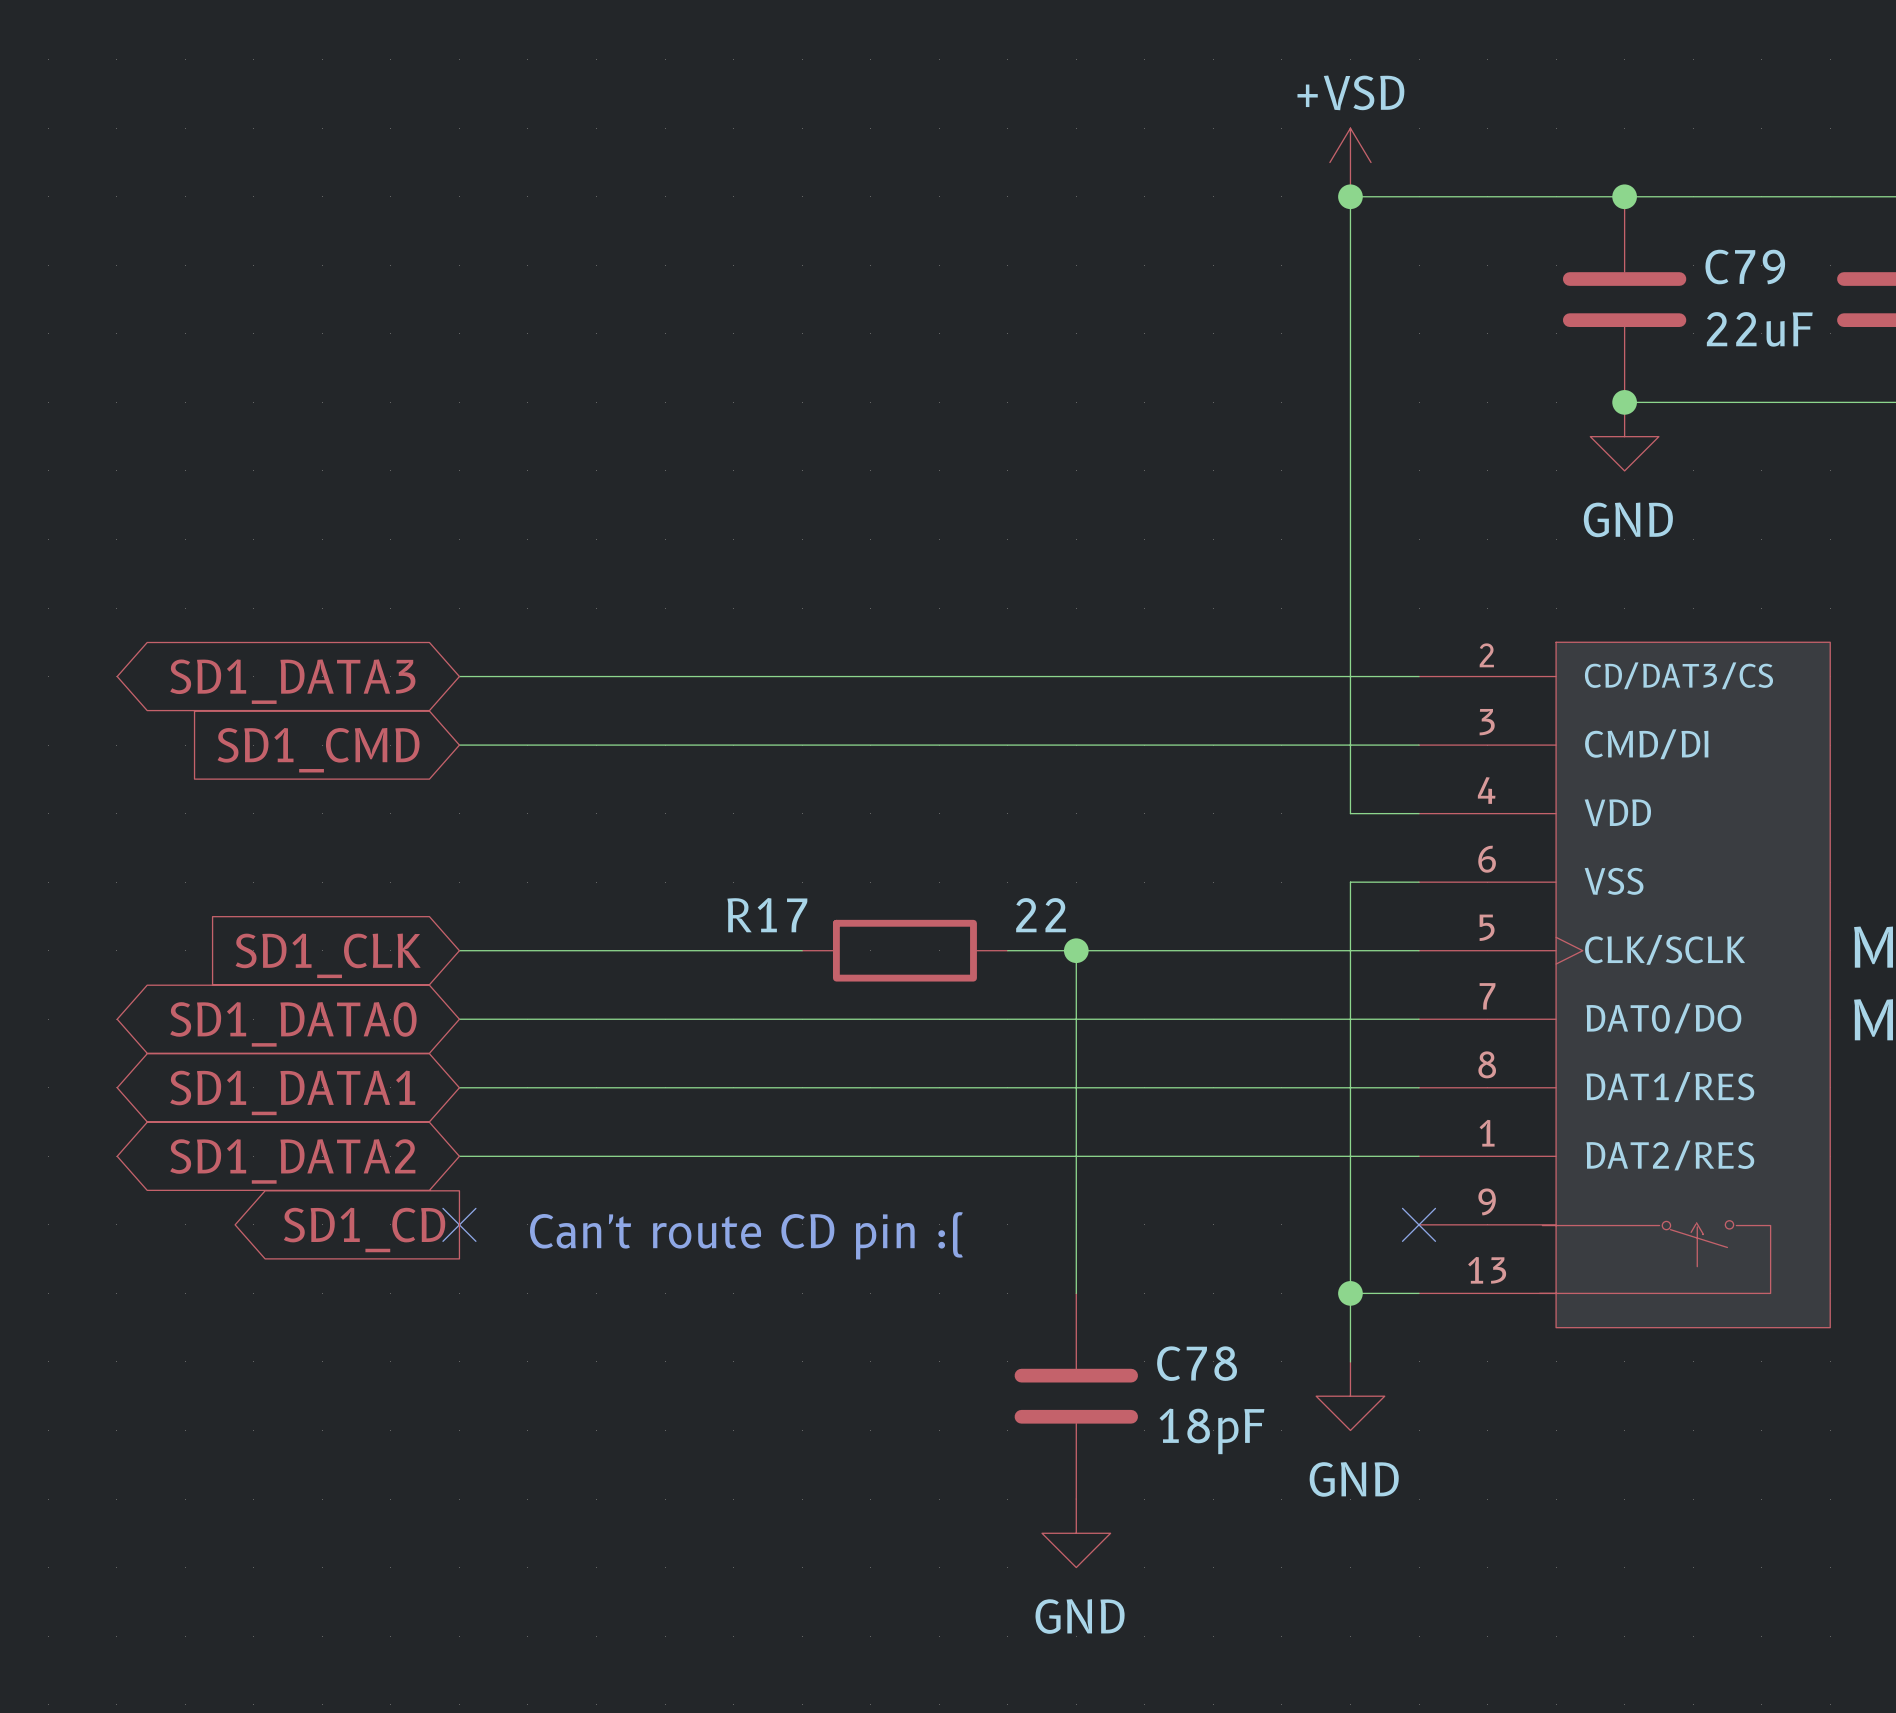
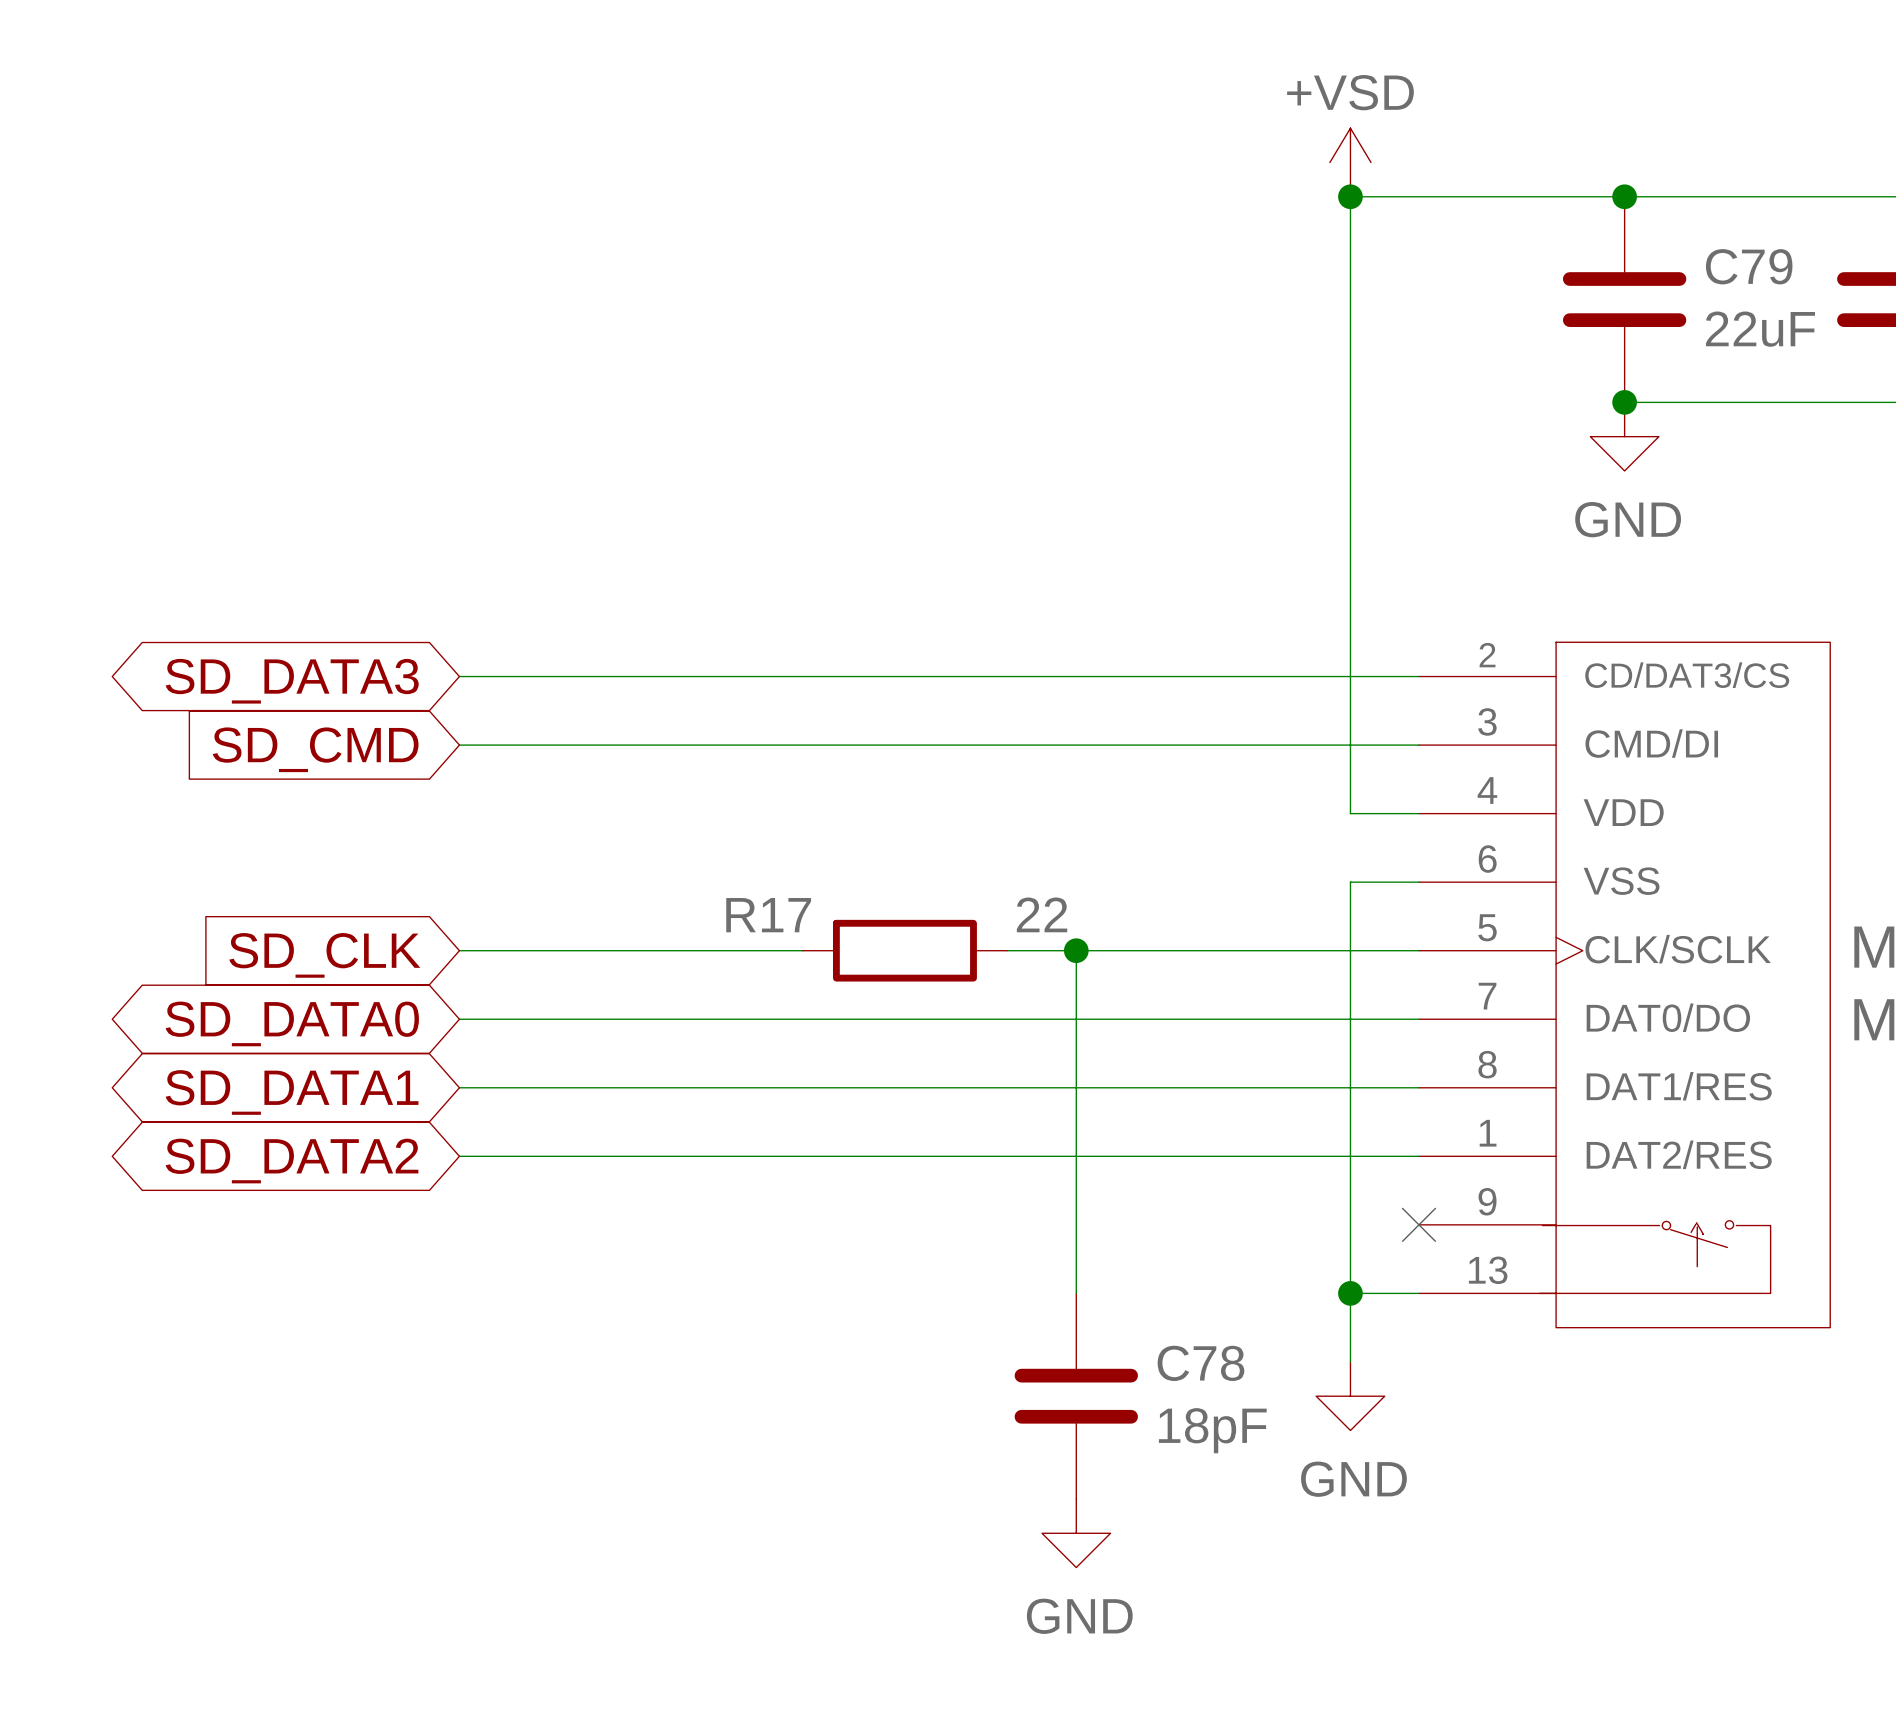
global label: SD1_DATA3 (292, 681) -> SD_DATA3 (292, 681)
global label: SD1_CMD (318, 750) -> SD_CMD (315, 749)
global label: SD1_CLK (328, 955) -> SD_CLK (324, 955)
global label: SD1_DATA0 (293, 1024) -> SD_DATA0 (292, 1023)
global label: SD1_DATA1 (292, 1092) -> SD_DATA1 (292, 1092)
global label: SD1_DATA2 (292, 1161) -> SD_DATA2 (292, 1161)
no-connect mark: (459, 1224) -> none
global label: SD1_CD (364, 1229) -> none
text: Can't route CD pin :( (746, 1235) -> none

